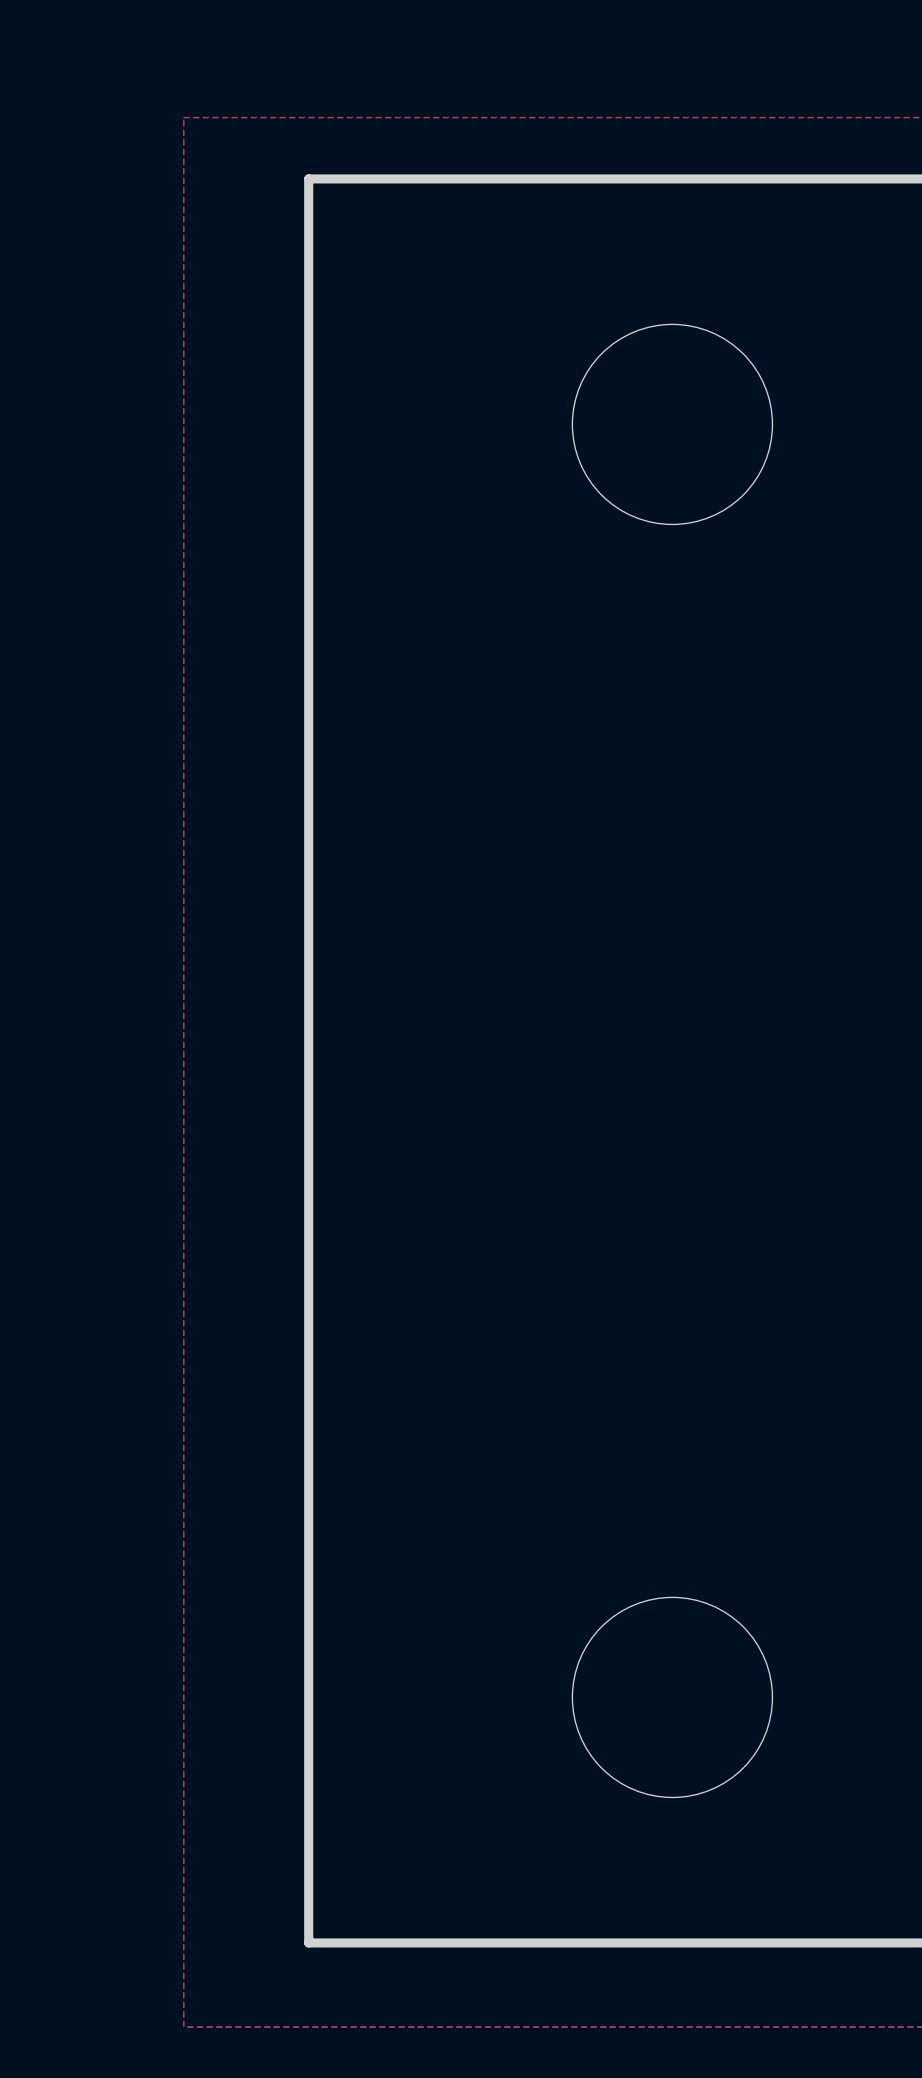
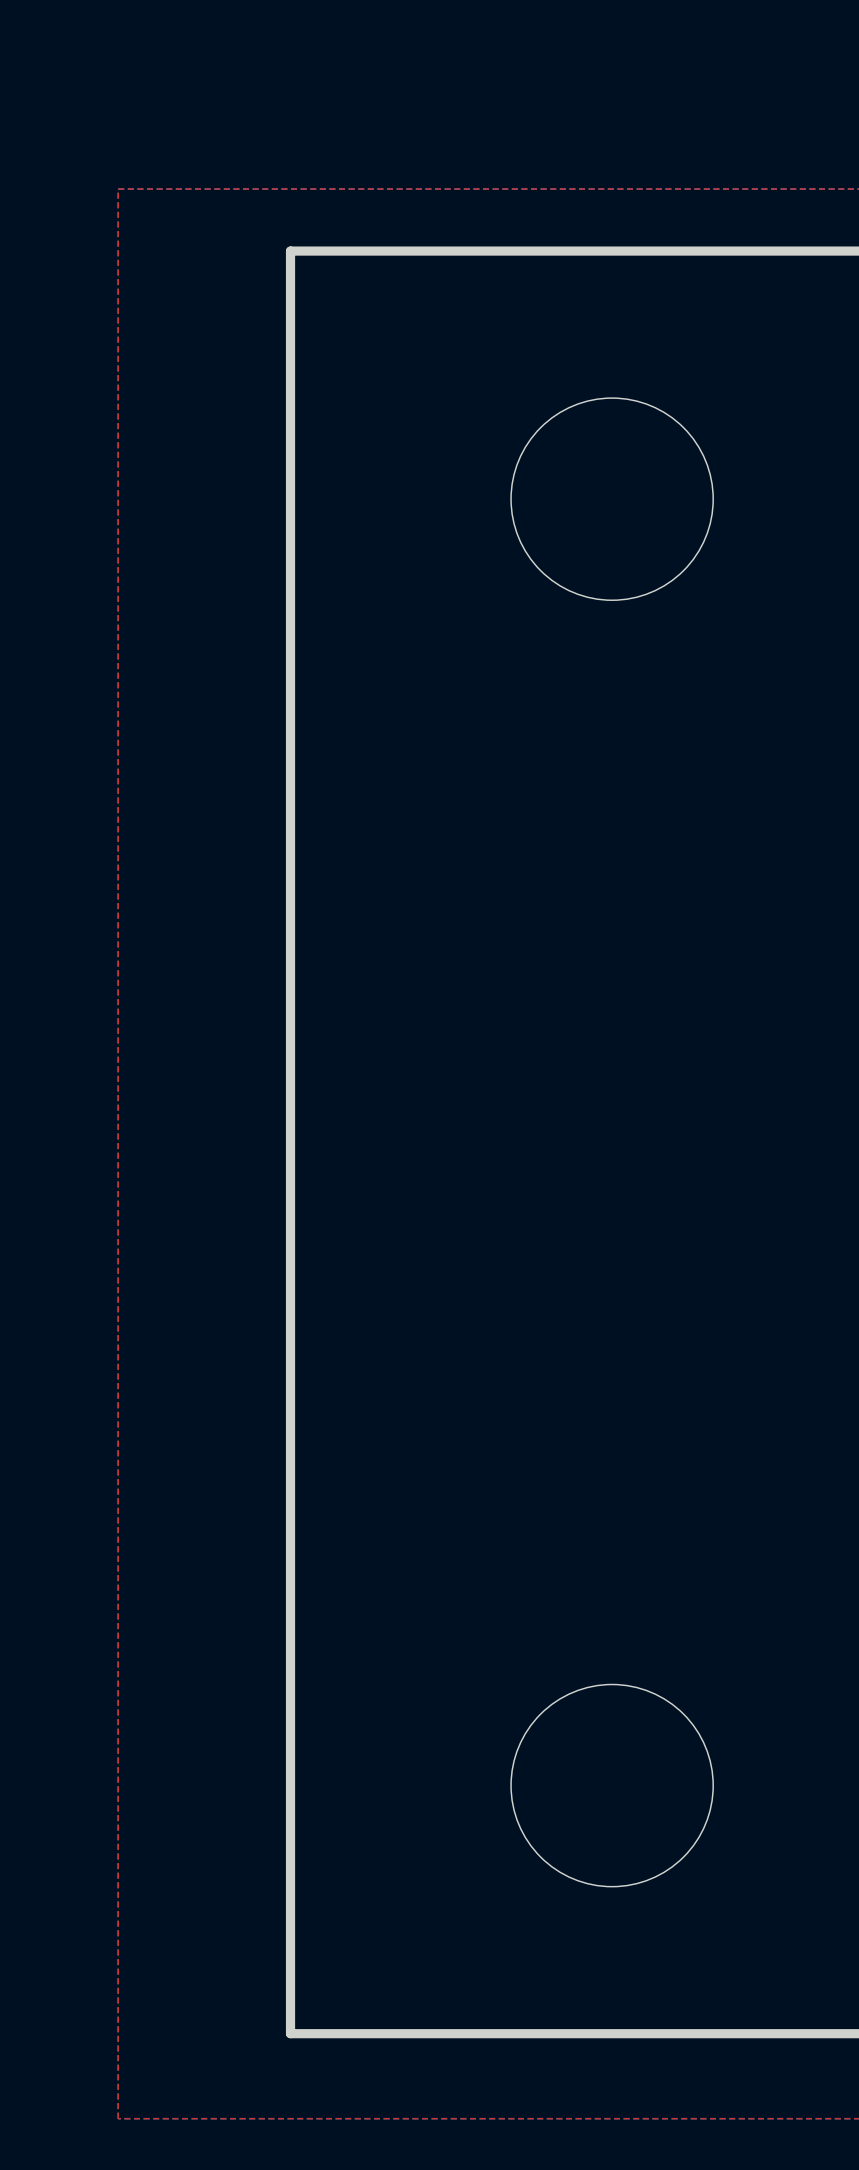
board edge: (354, 178) (308, 178) (308, 1942) (354, 1942) -> (290, 251) (290, 2033)

